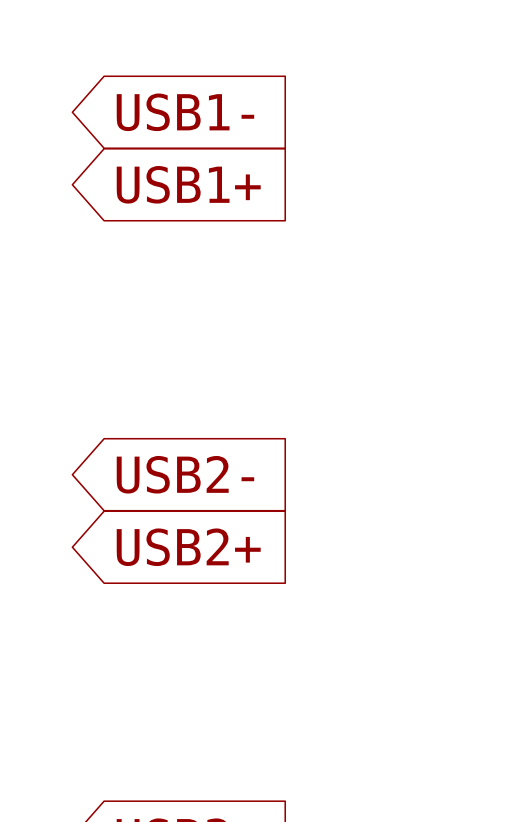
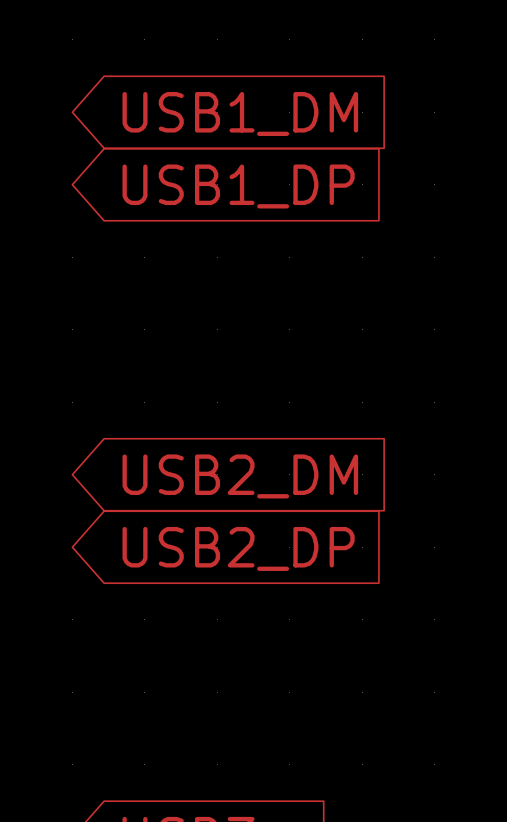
global label: USB1- (185, 112) -> USB1_DM (240, 113)
global label: USB1+ (188, 184) -> USB1_DP (238, 186)
global label: USB2- (185, 474) -> USB2_DM (240, 476)
global label: USB2+ (188, 547) -> USB2_DP (238, 548)

